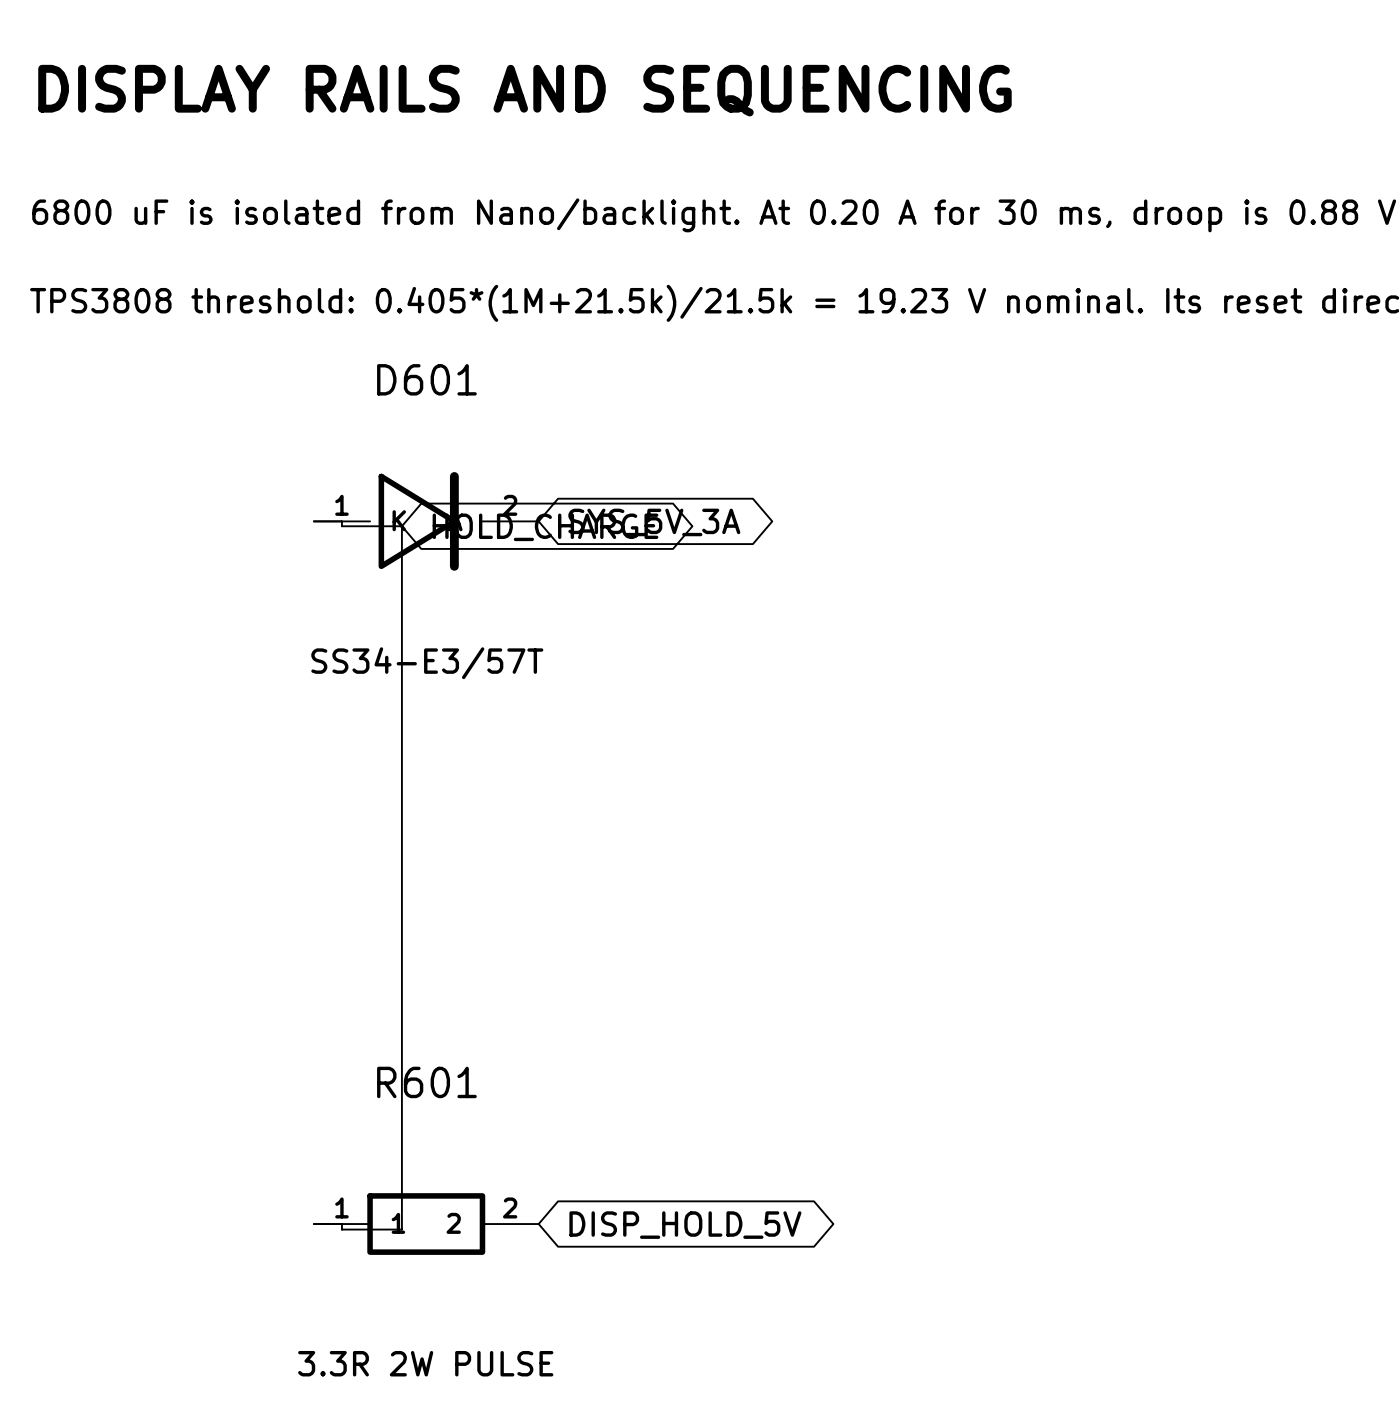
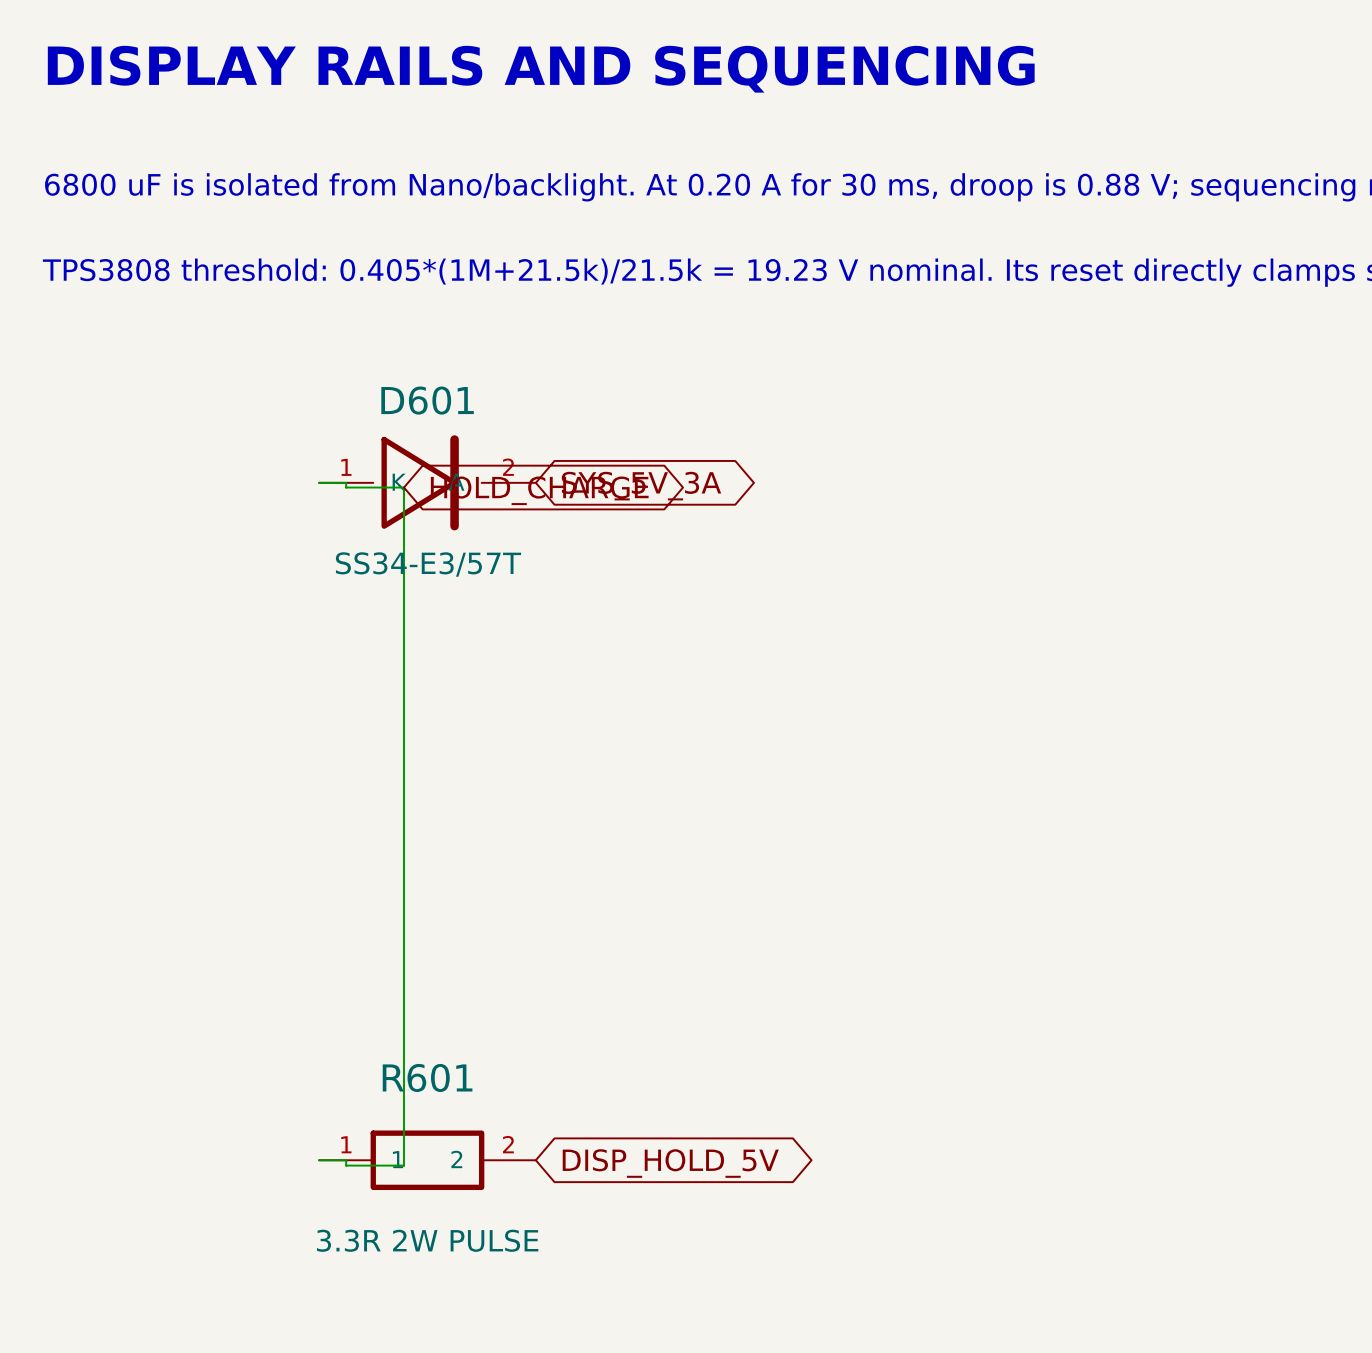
D601 name position: D601 (426, 379) -> D601 (427, 400)
D601 value position: SS34-E3/57T (427, 663) -> SS34-E3/57T (428, 564)
R601 name position: R601 (426, 1082) -> R601 (427, 1077)
R601 value position: 3.3R 2W PULSE (425, 1363) -> 3.3R 2W PULSE (427, 1240)

